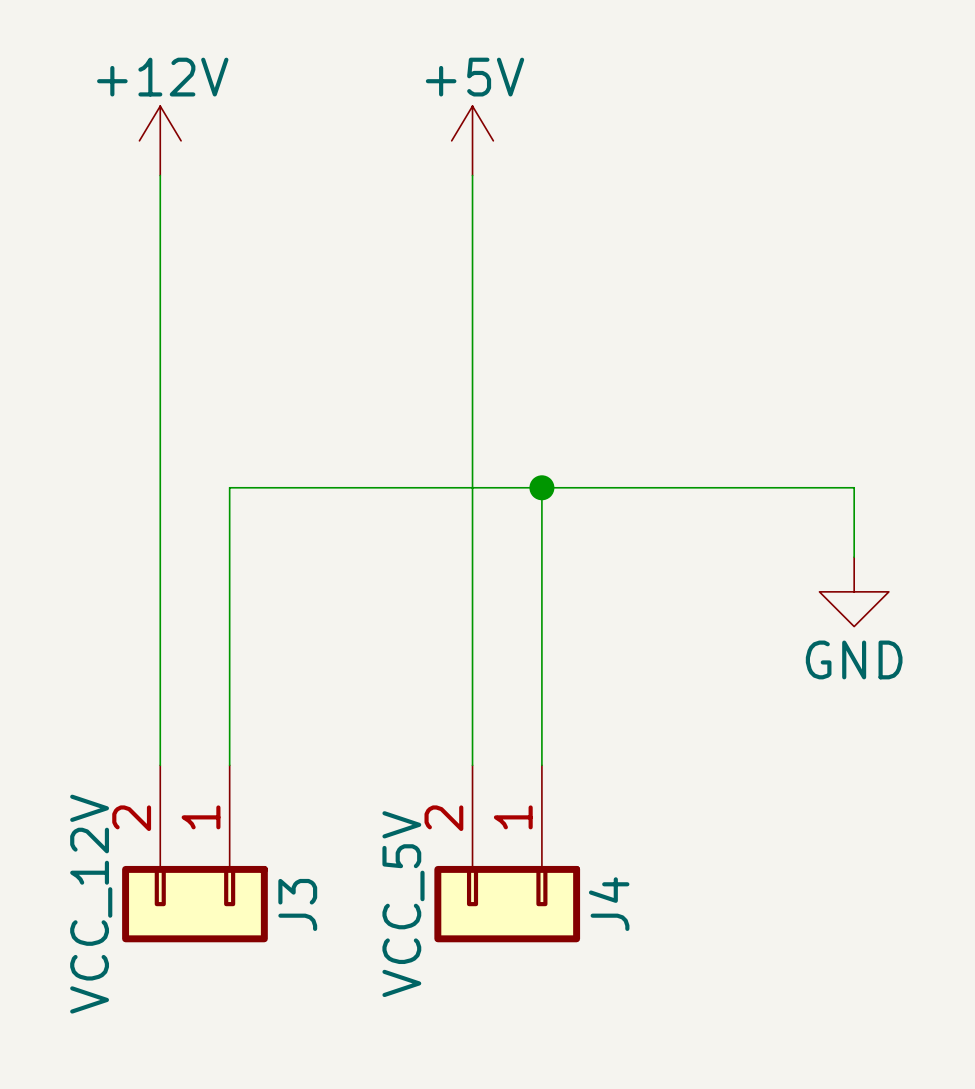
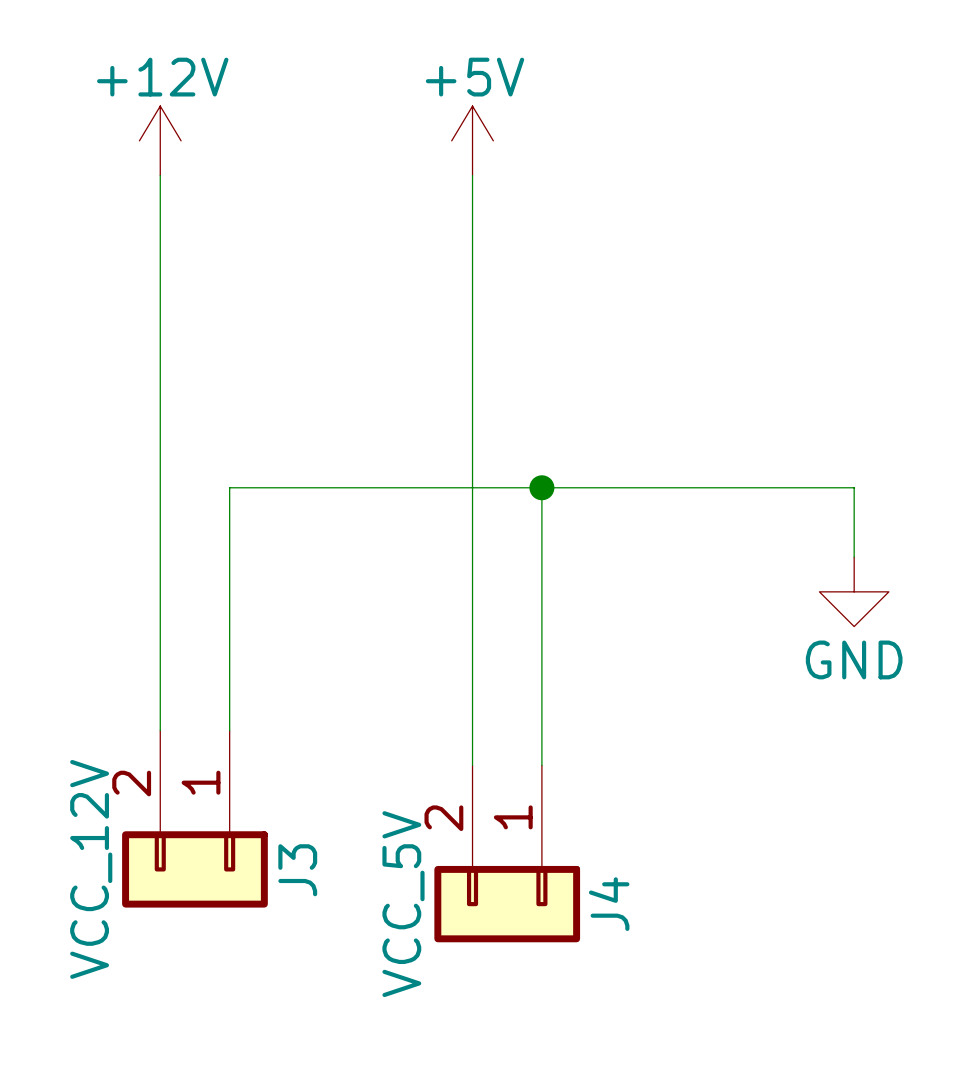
J3 position: (194, 853) -> (194, 819)

